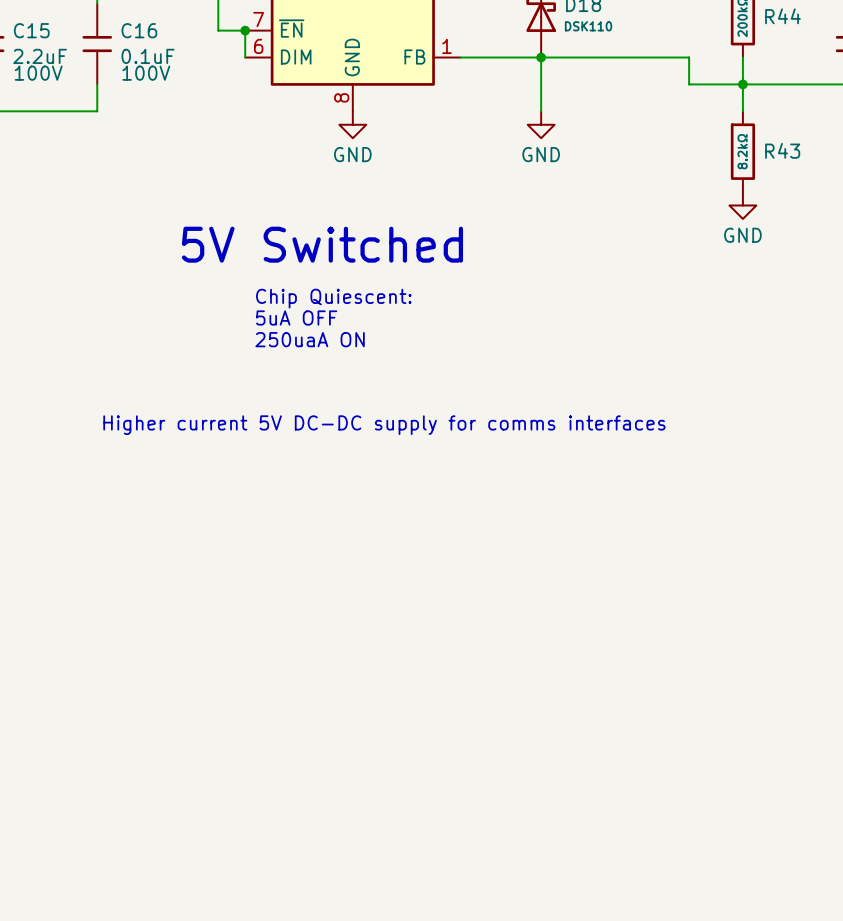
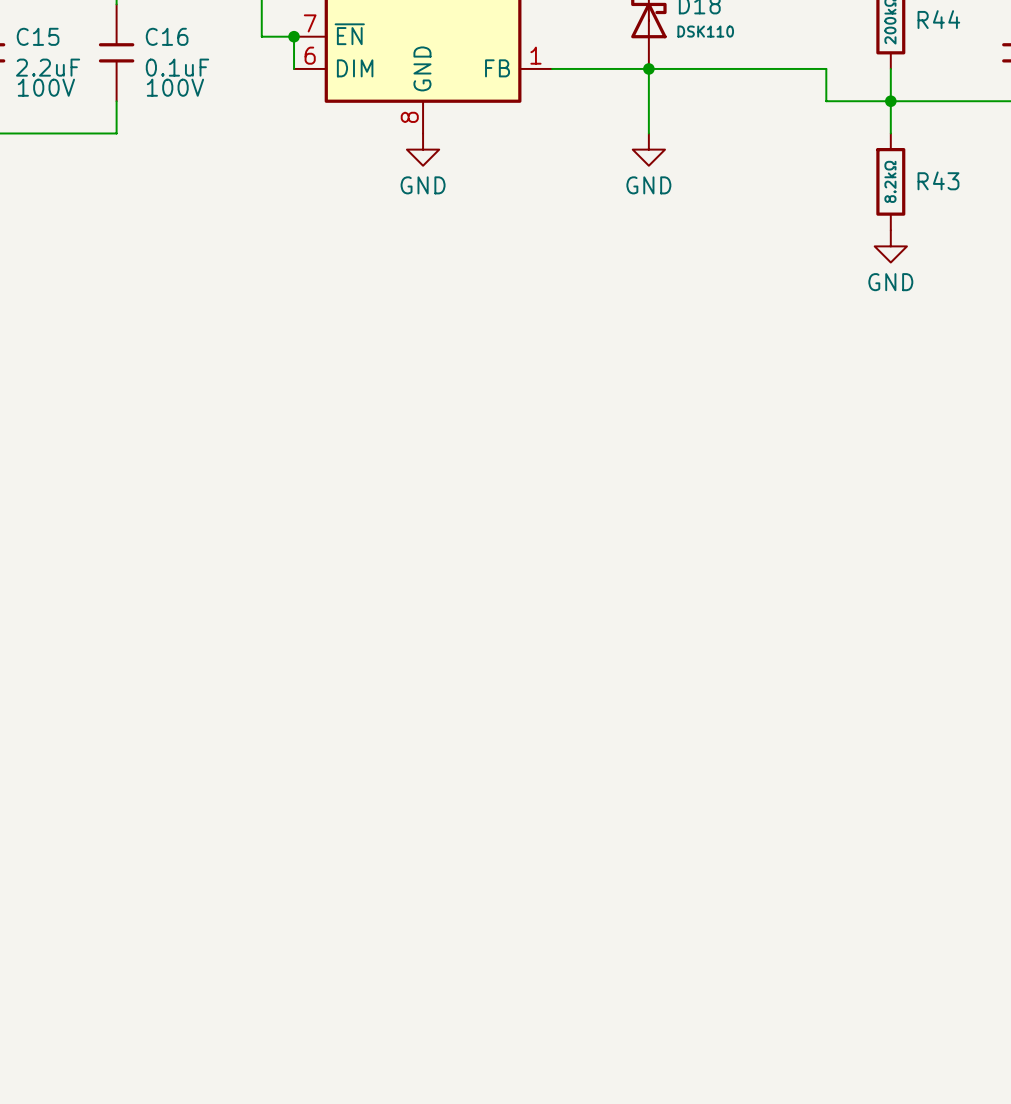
text: 5V Switched (322, 244) -> none
text: Chip Quiescent: (333, 298) -> none
text: 5uA OFF (296, 318) -> none
text: 250uaA ON (310, 339) -> none
text: Higher current 5V DC-DC supply for comms interfaces (384, 425) -> none

